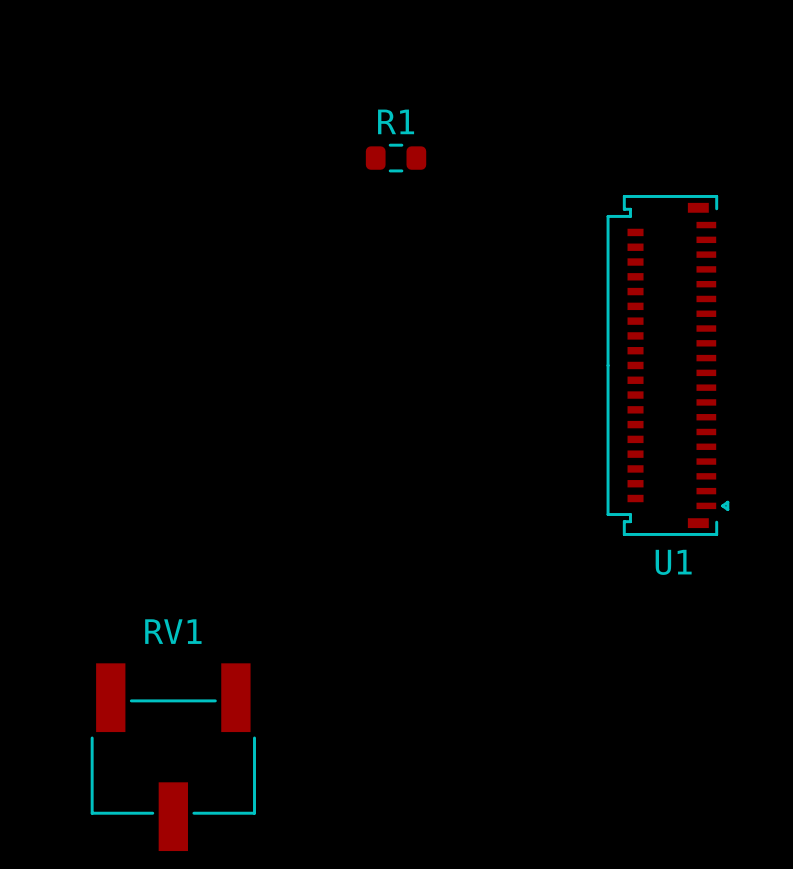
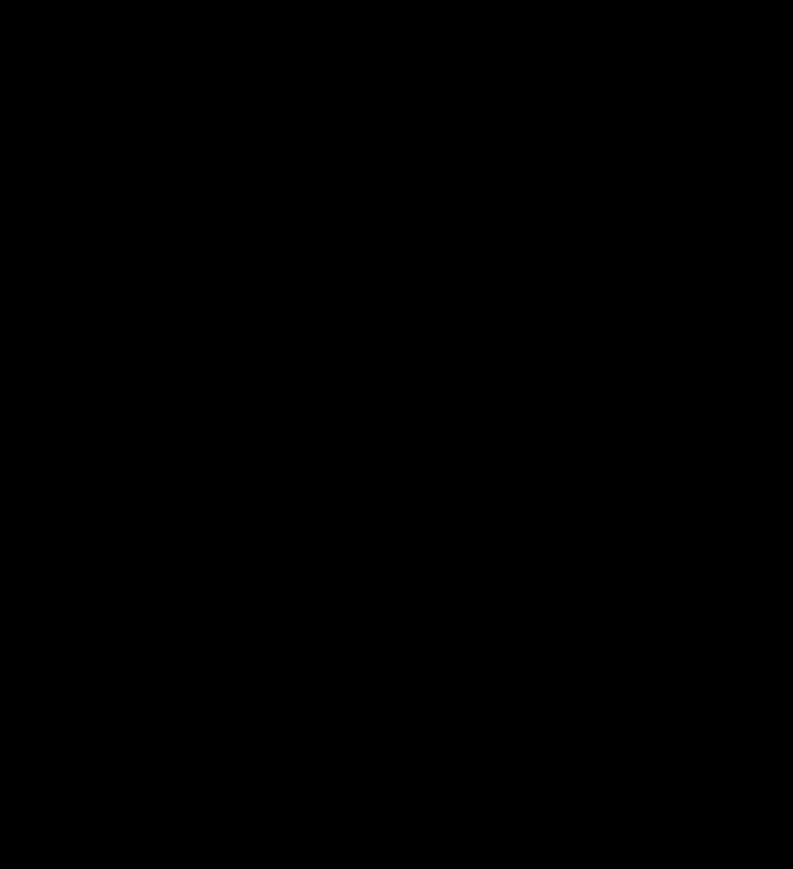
R1: (396, 158) -> none
U1: (667, 365) -> none
RV1: (173, 757) -> none

